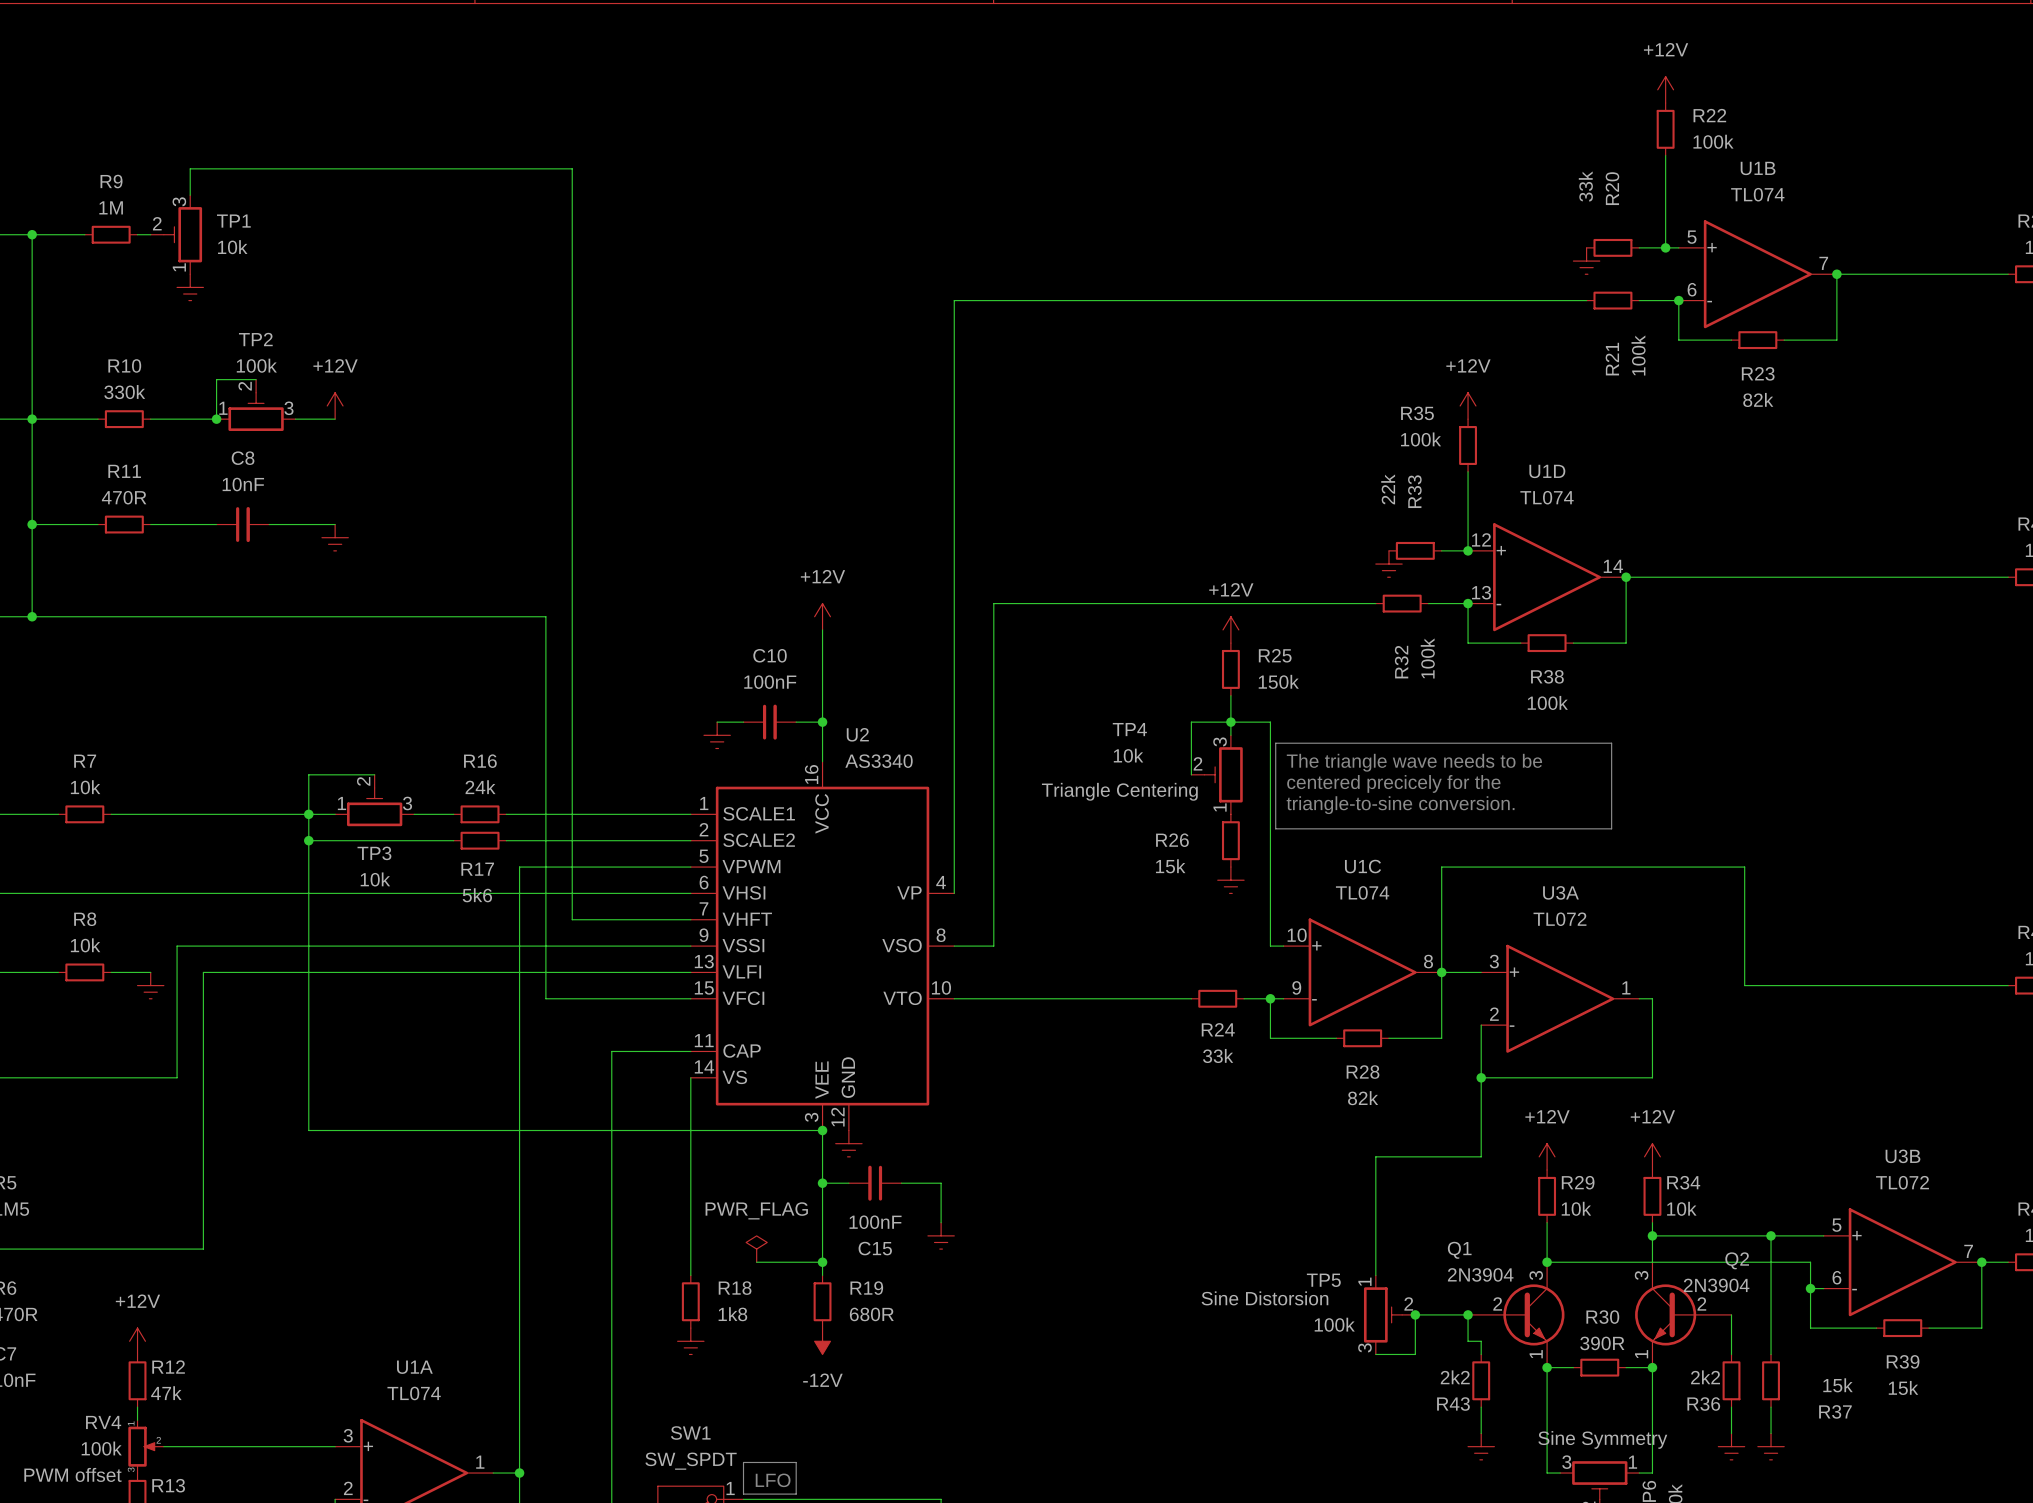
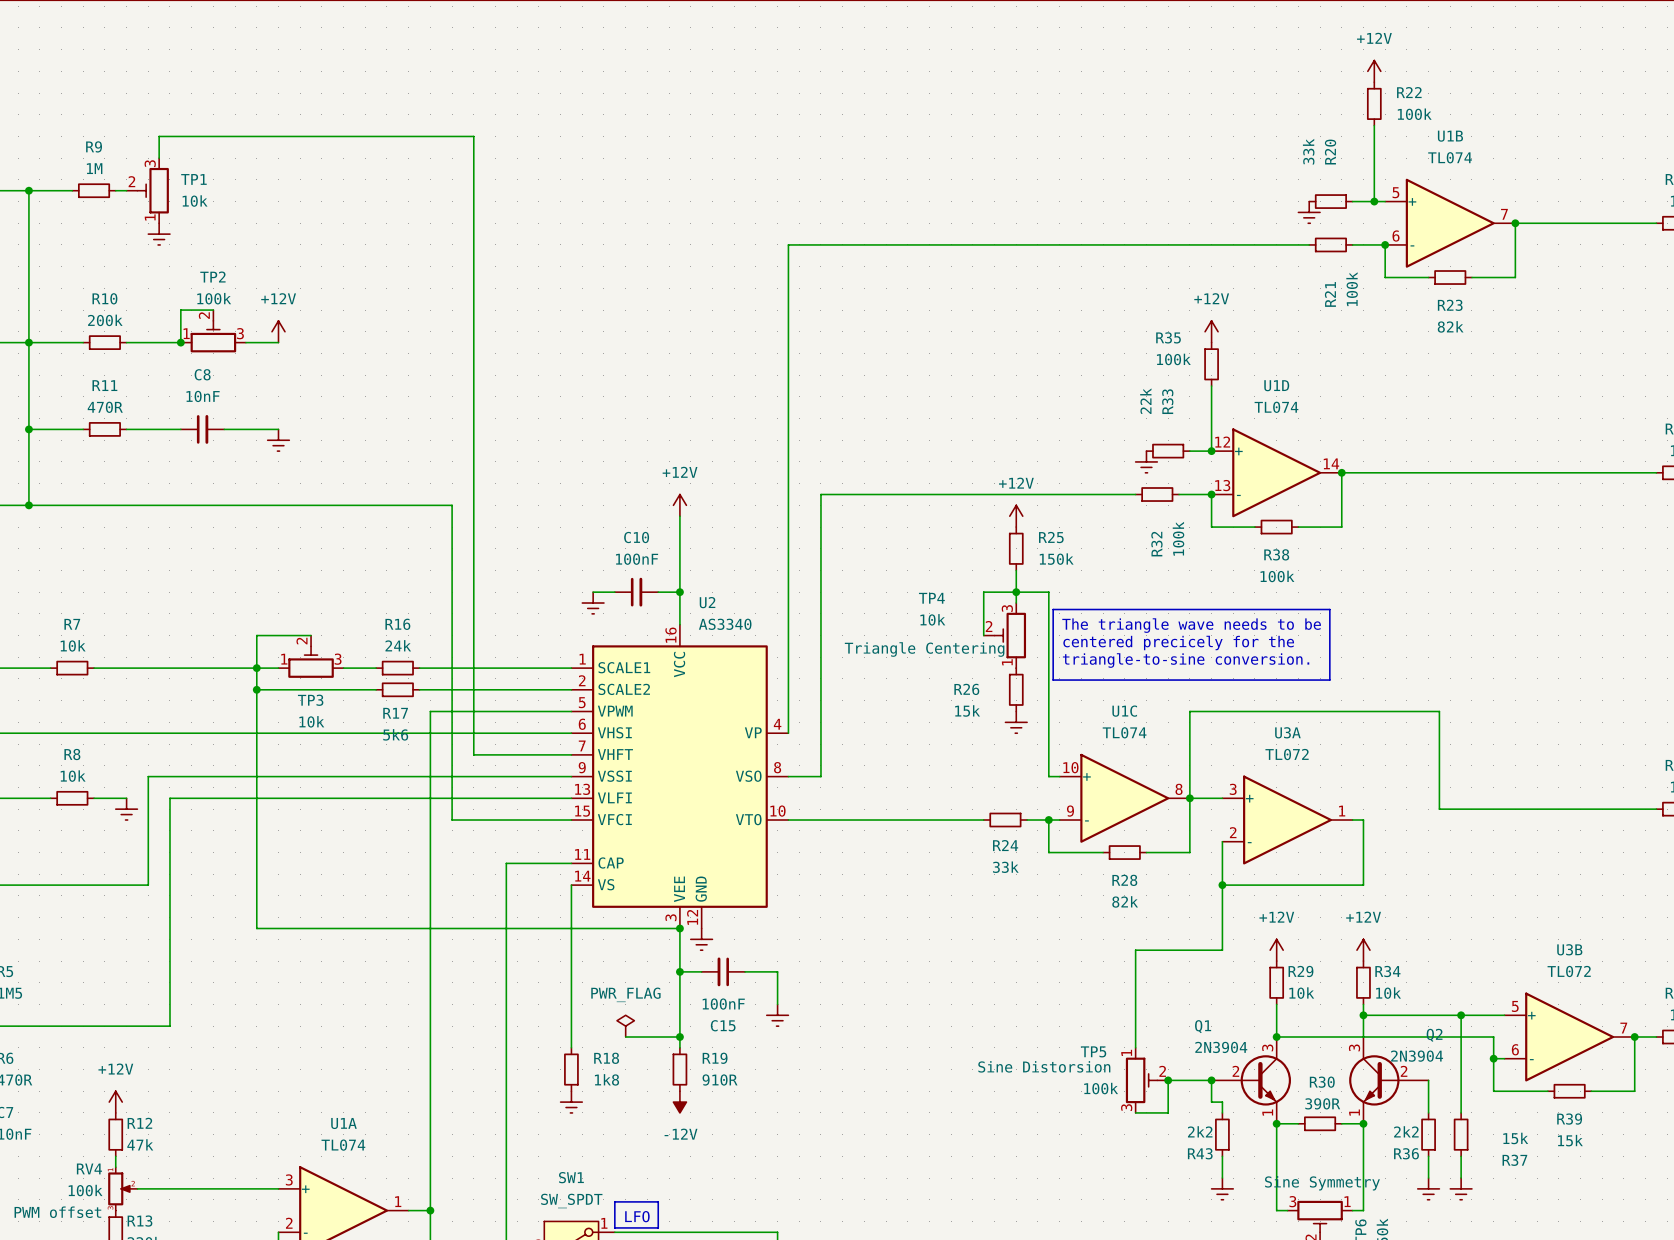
R10 value: 330k (124, 392) -> 200k (105, 320)
R19 value: 680R (871, 1314) -> 910R (720, 1080)

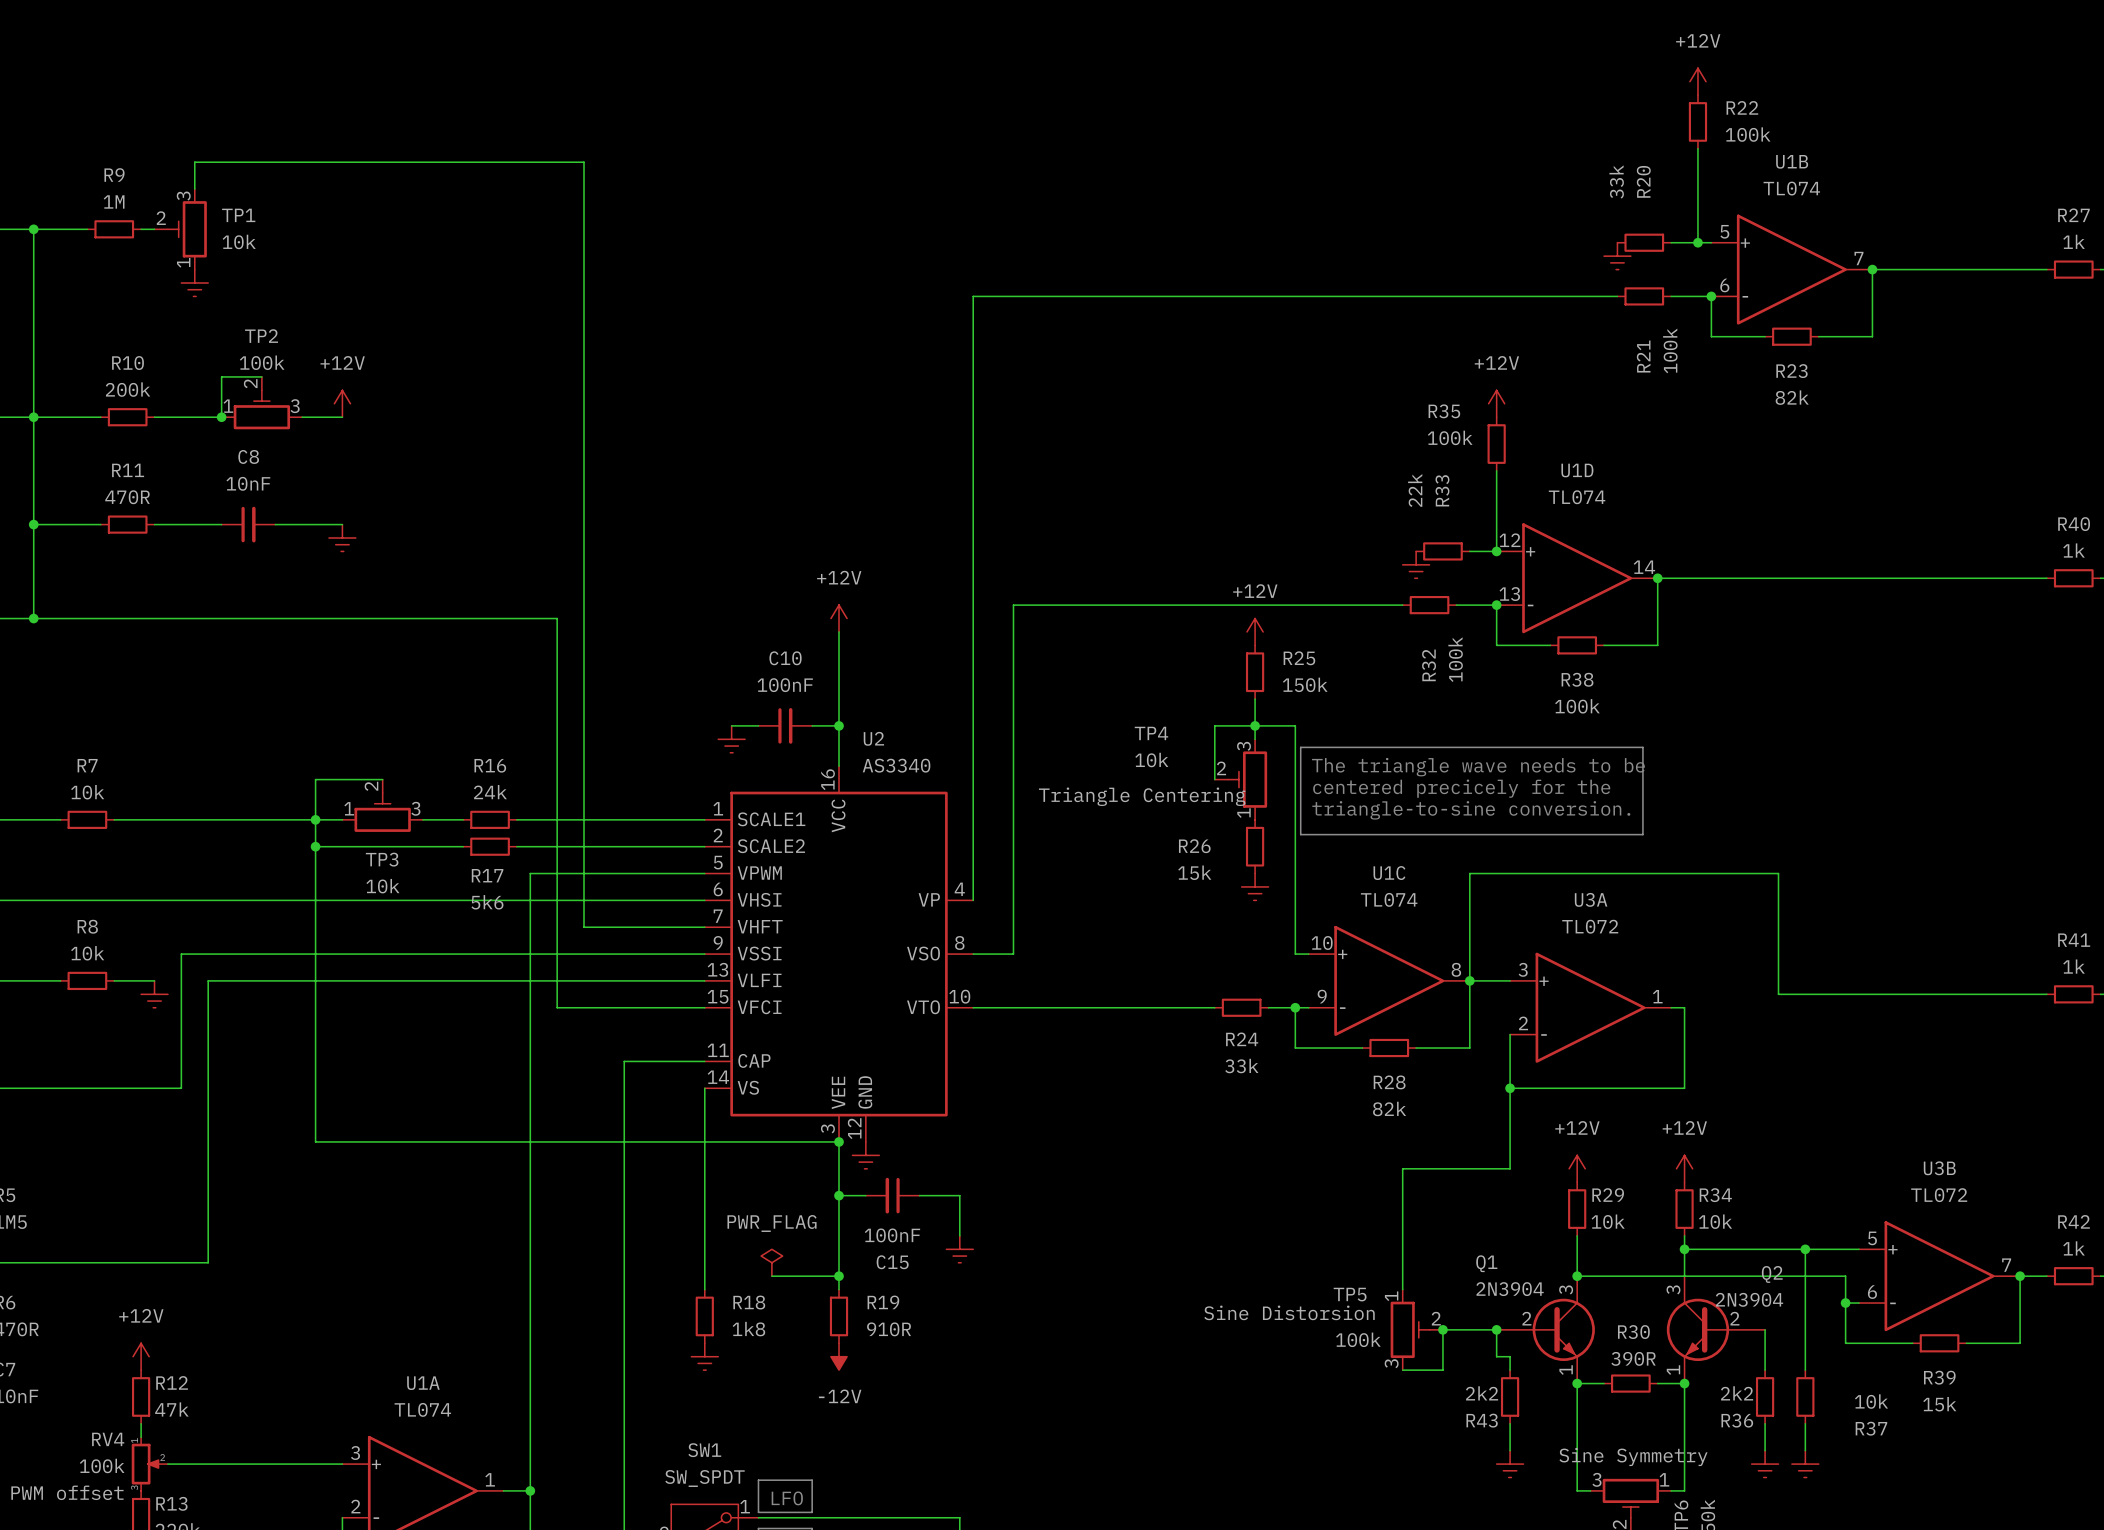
R37 value: 15k (1515, 1138) -> 10k (1871, 1401)

